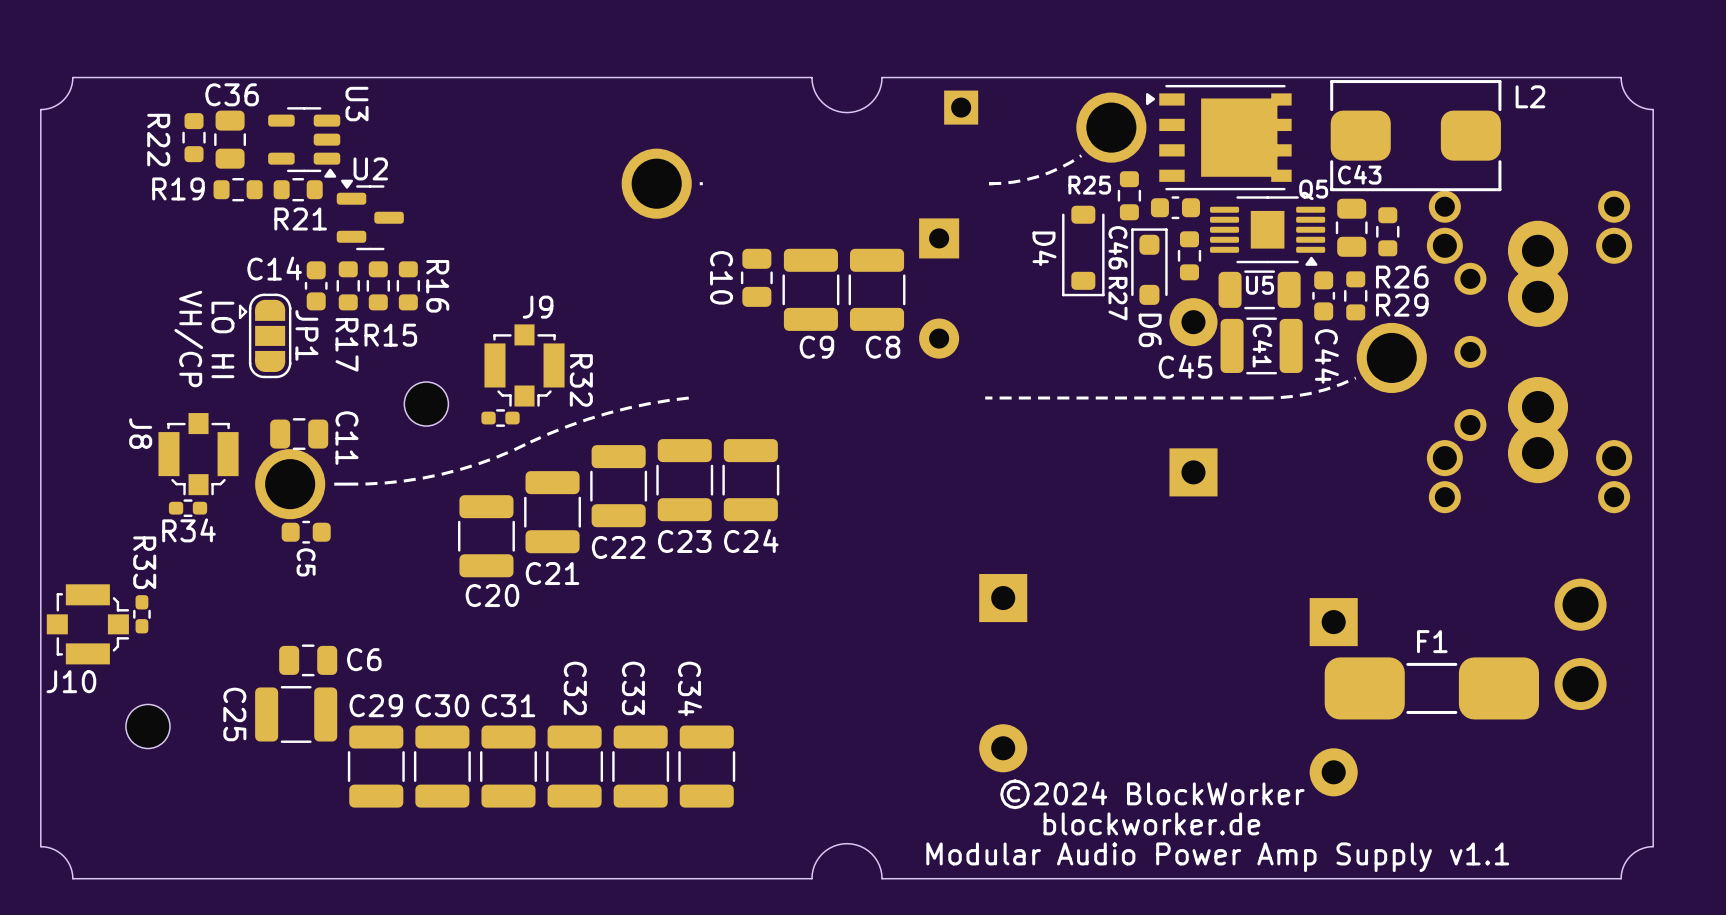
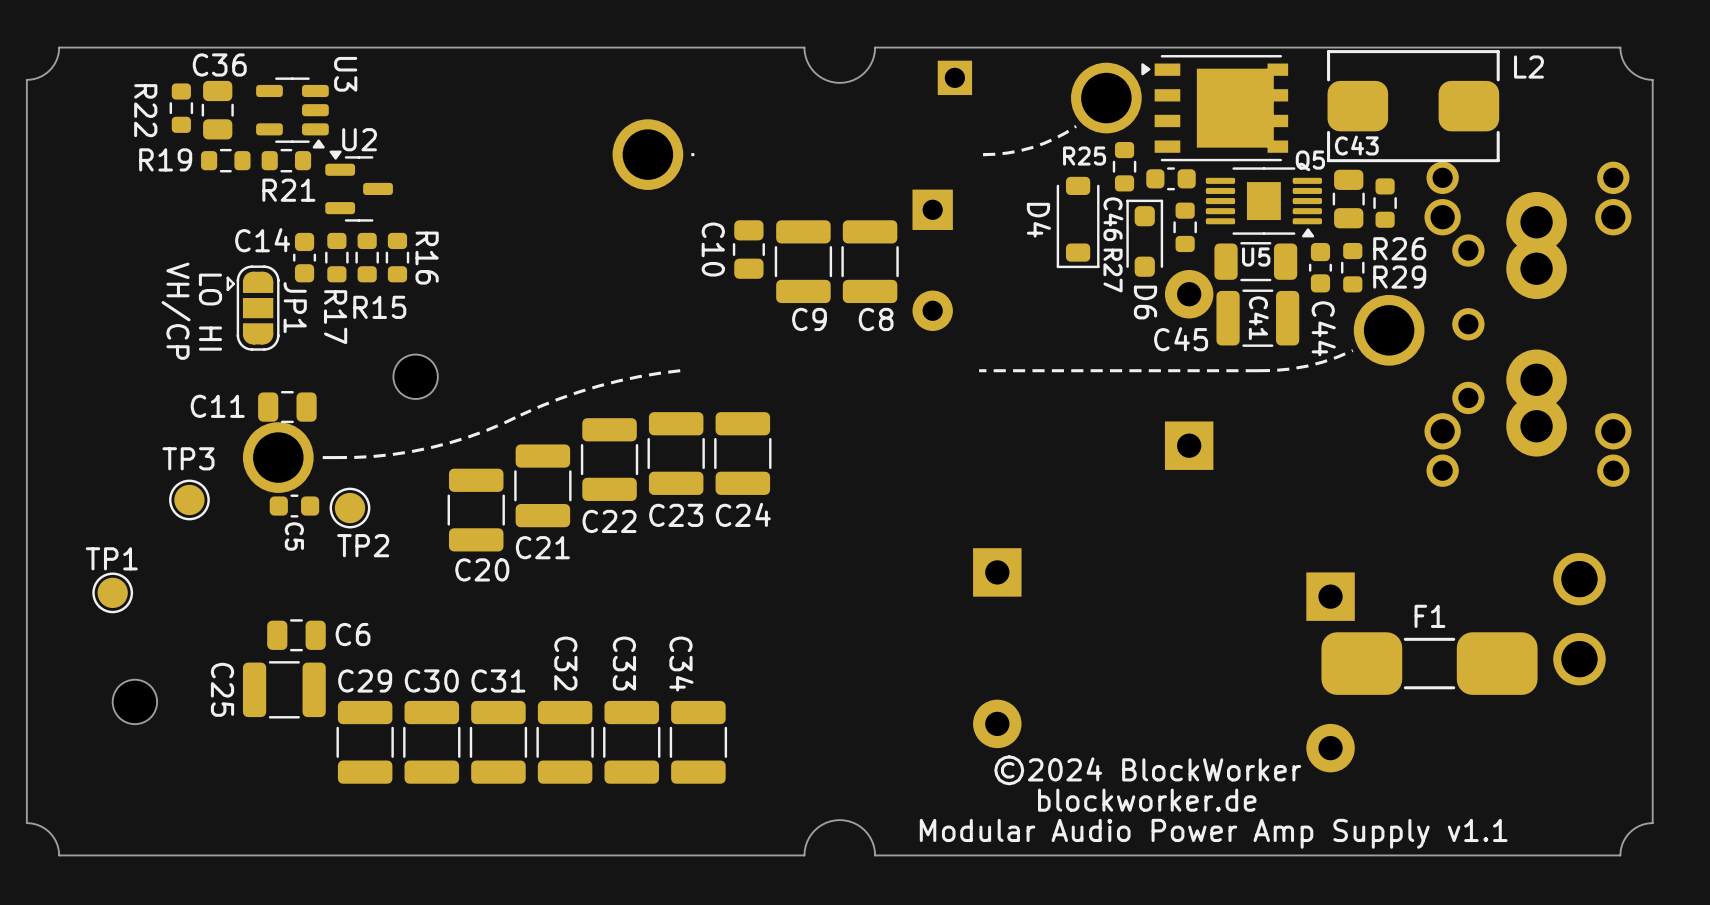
J9: (524, 365) -> none
R32: (500, 418) -> none
C11 name rotation: 0° (347, 438) -> 90° counterclockwise (217, 406)
C11 name position: C11 (347, 438) -> C11 (217, 406)
J8: (198, 454) -> none
R34: (188, 508) -> none
TP3: none -> (189, 499)
TP2: none -> (350, 508)
R33: (141, 614) -> none
TP1: none -> (112, 592)
J10: (87, 624) -> none

